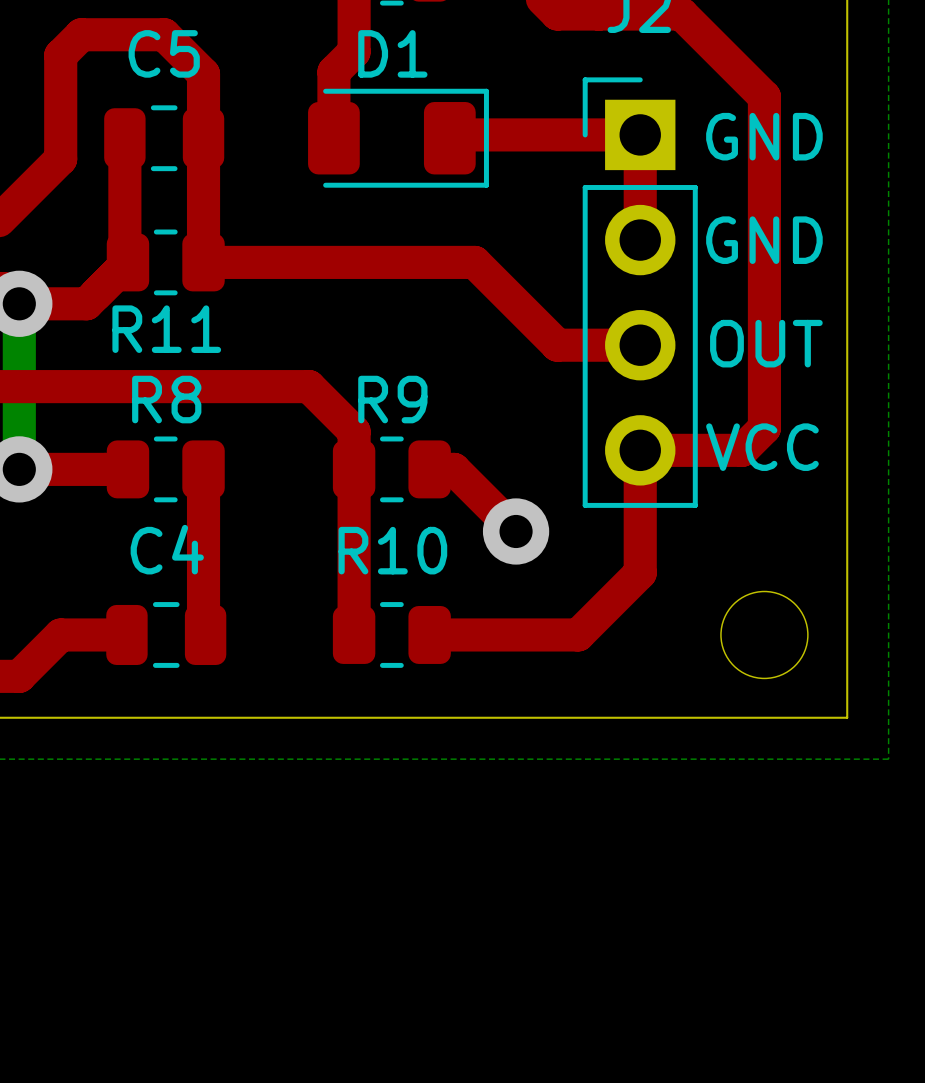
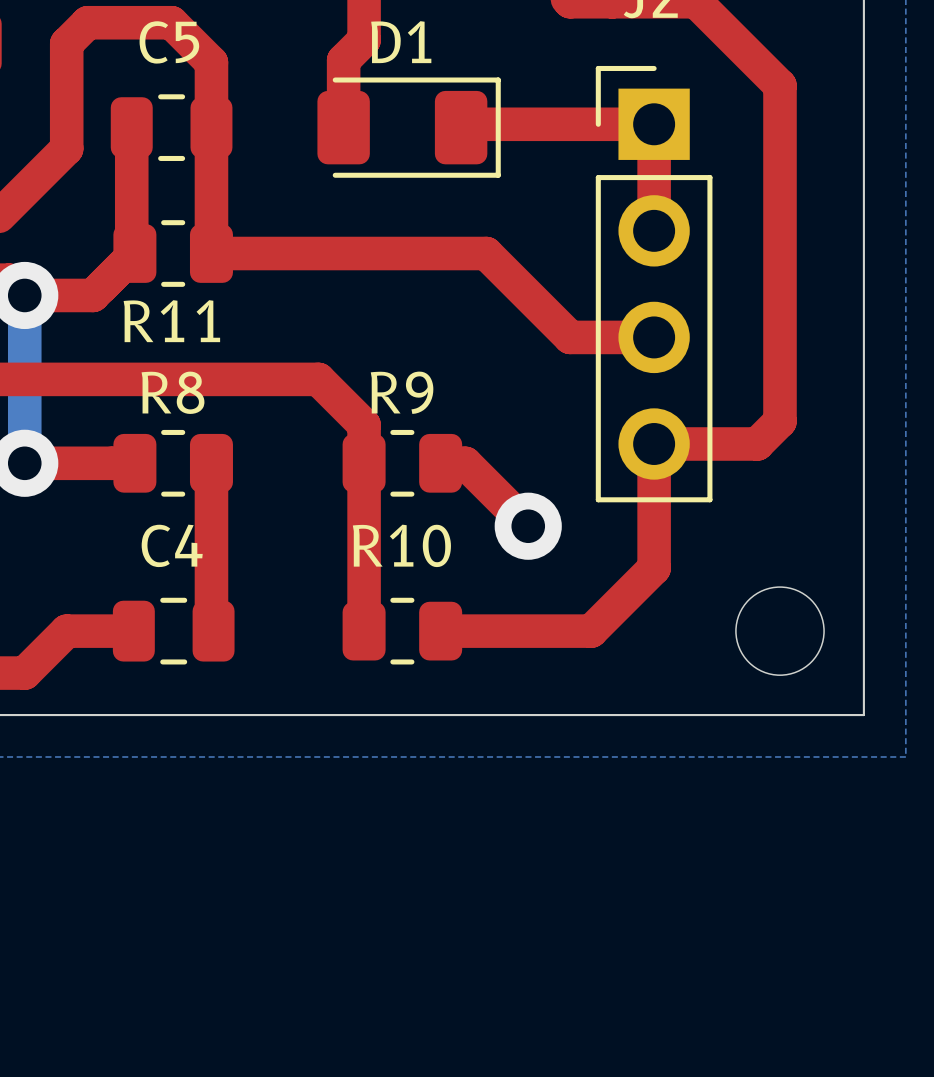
text: GND (764, 136) -> none
text: GND (764, 240) -> none
text: OUT (766, 343) -> none
text: VCC (762, 447) -> none

